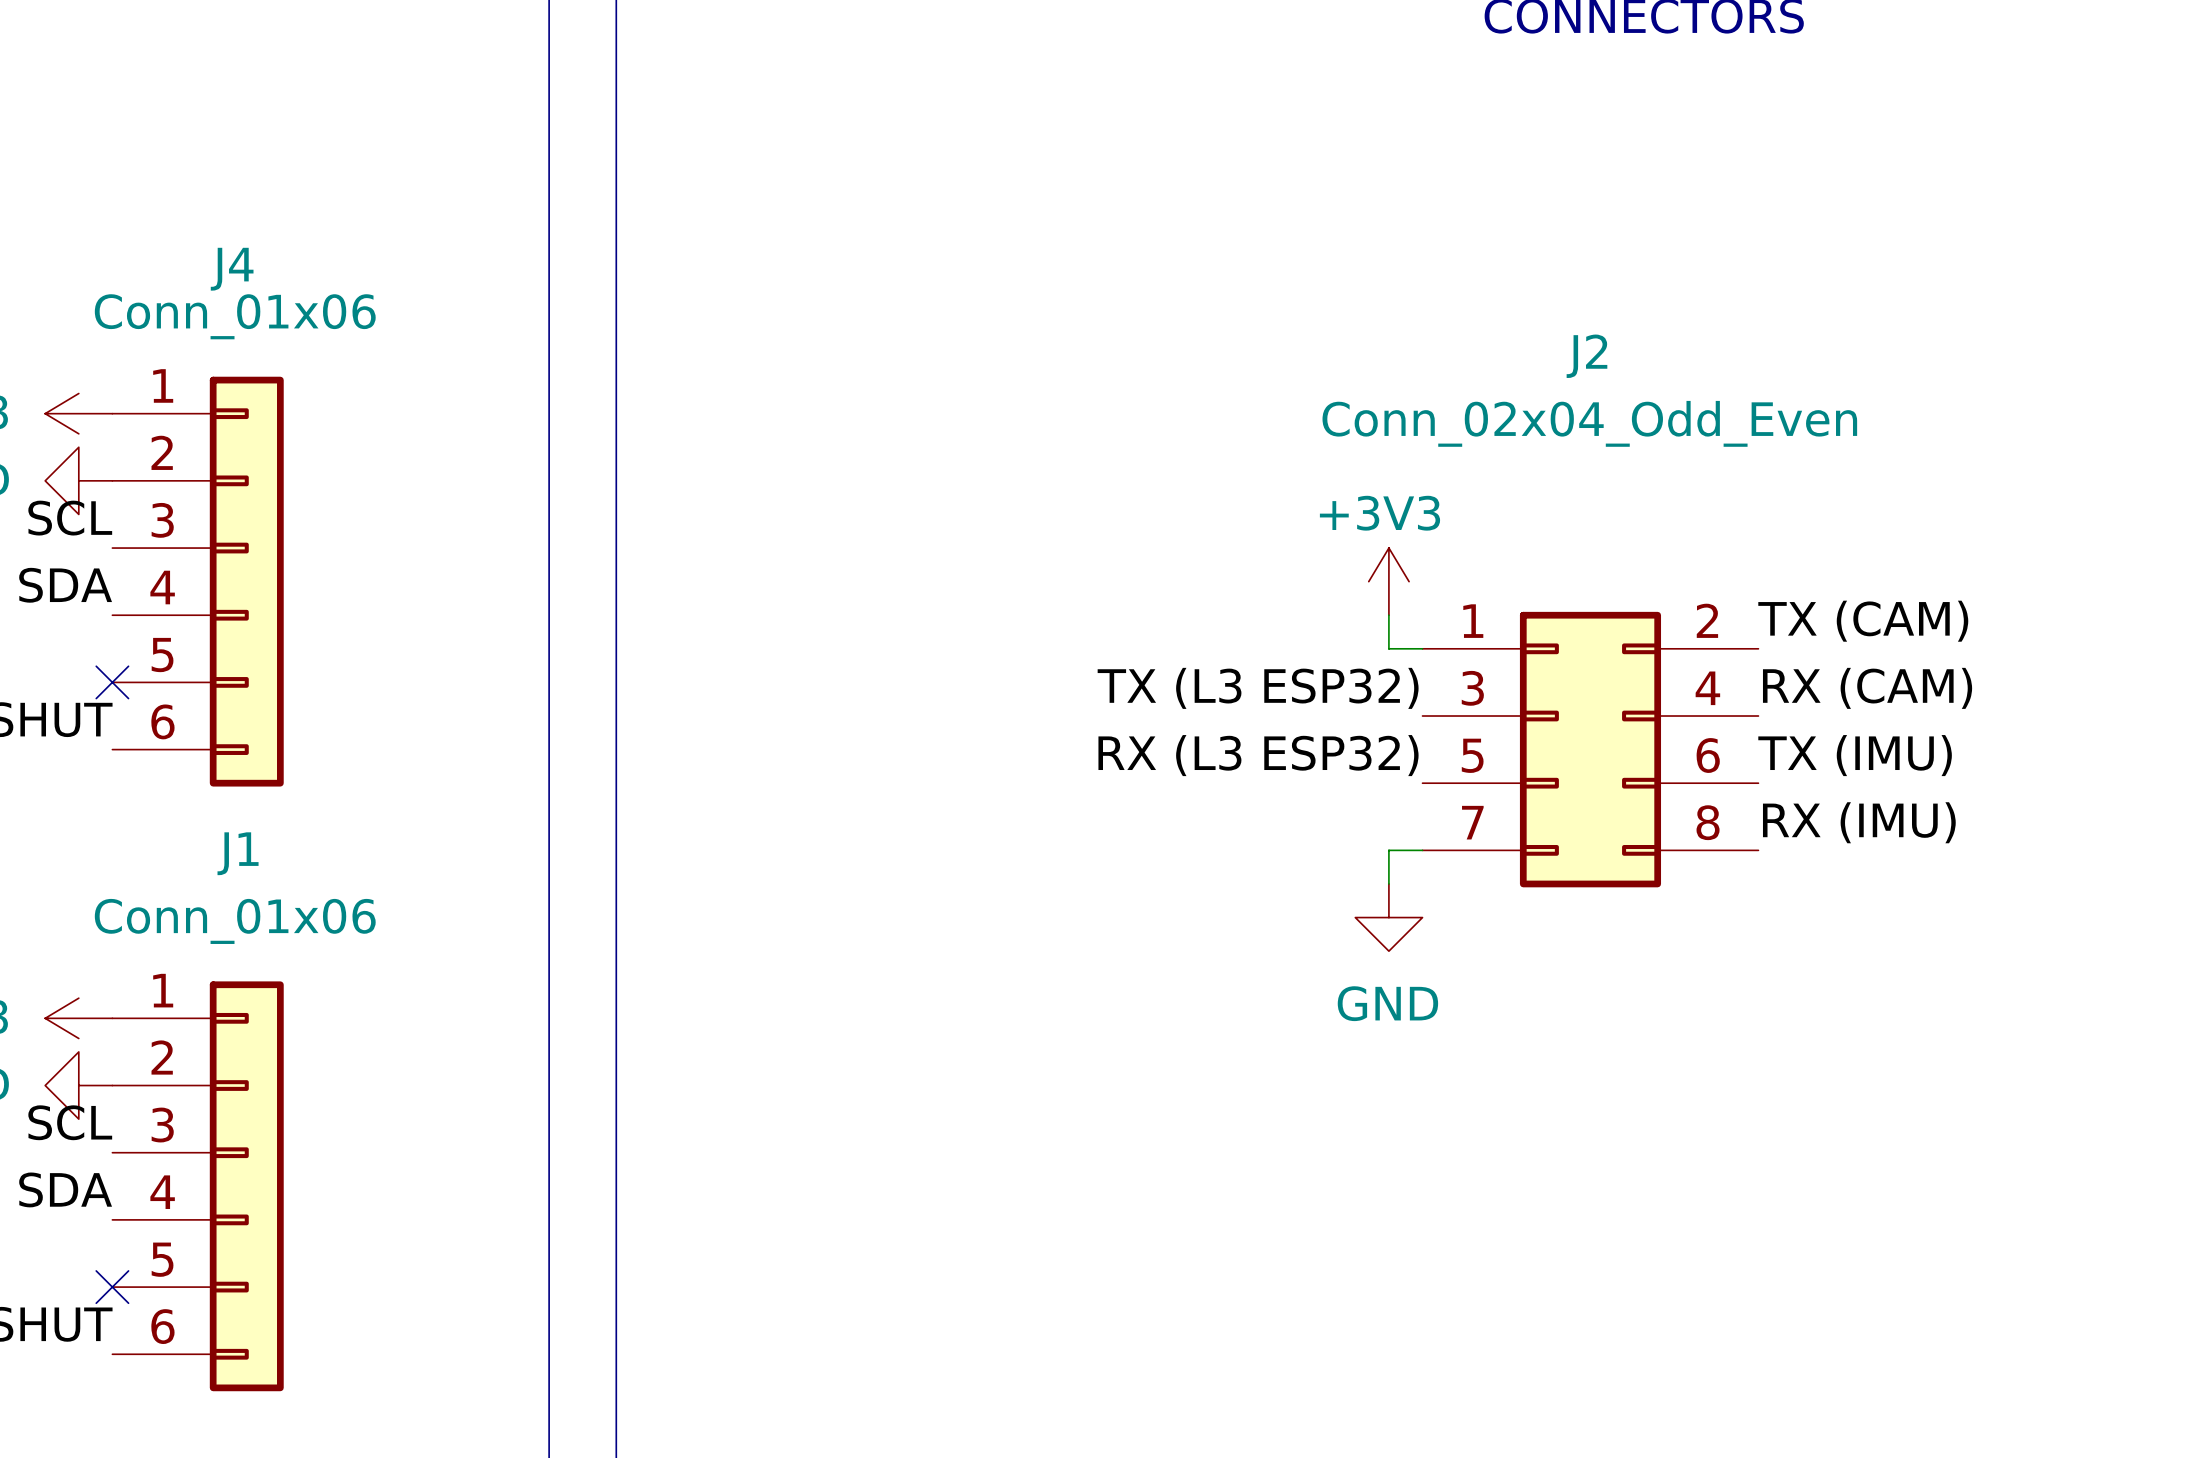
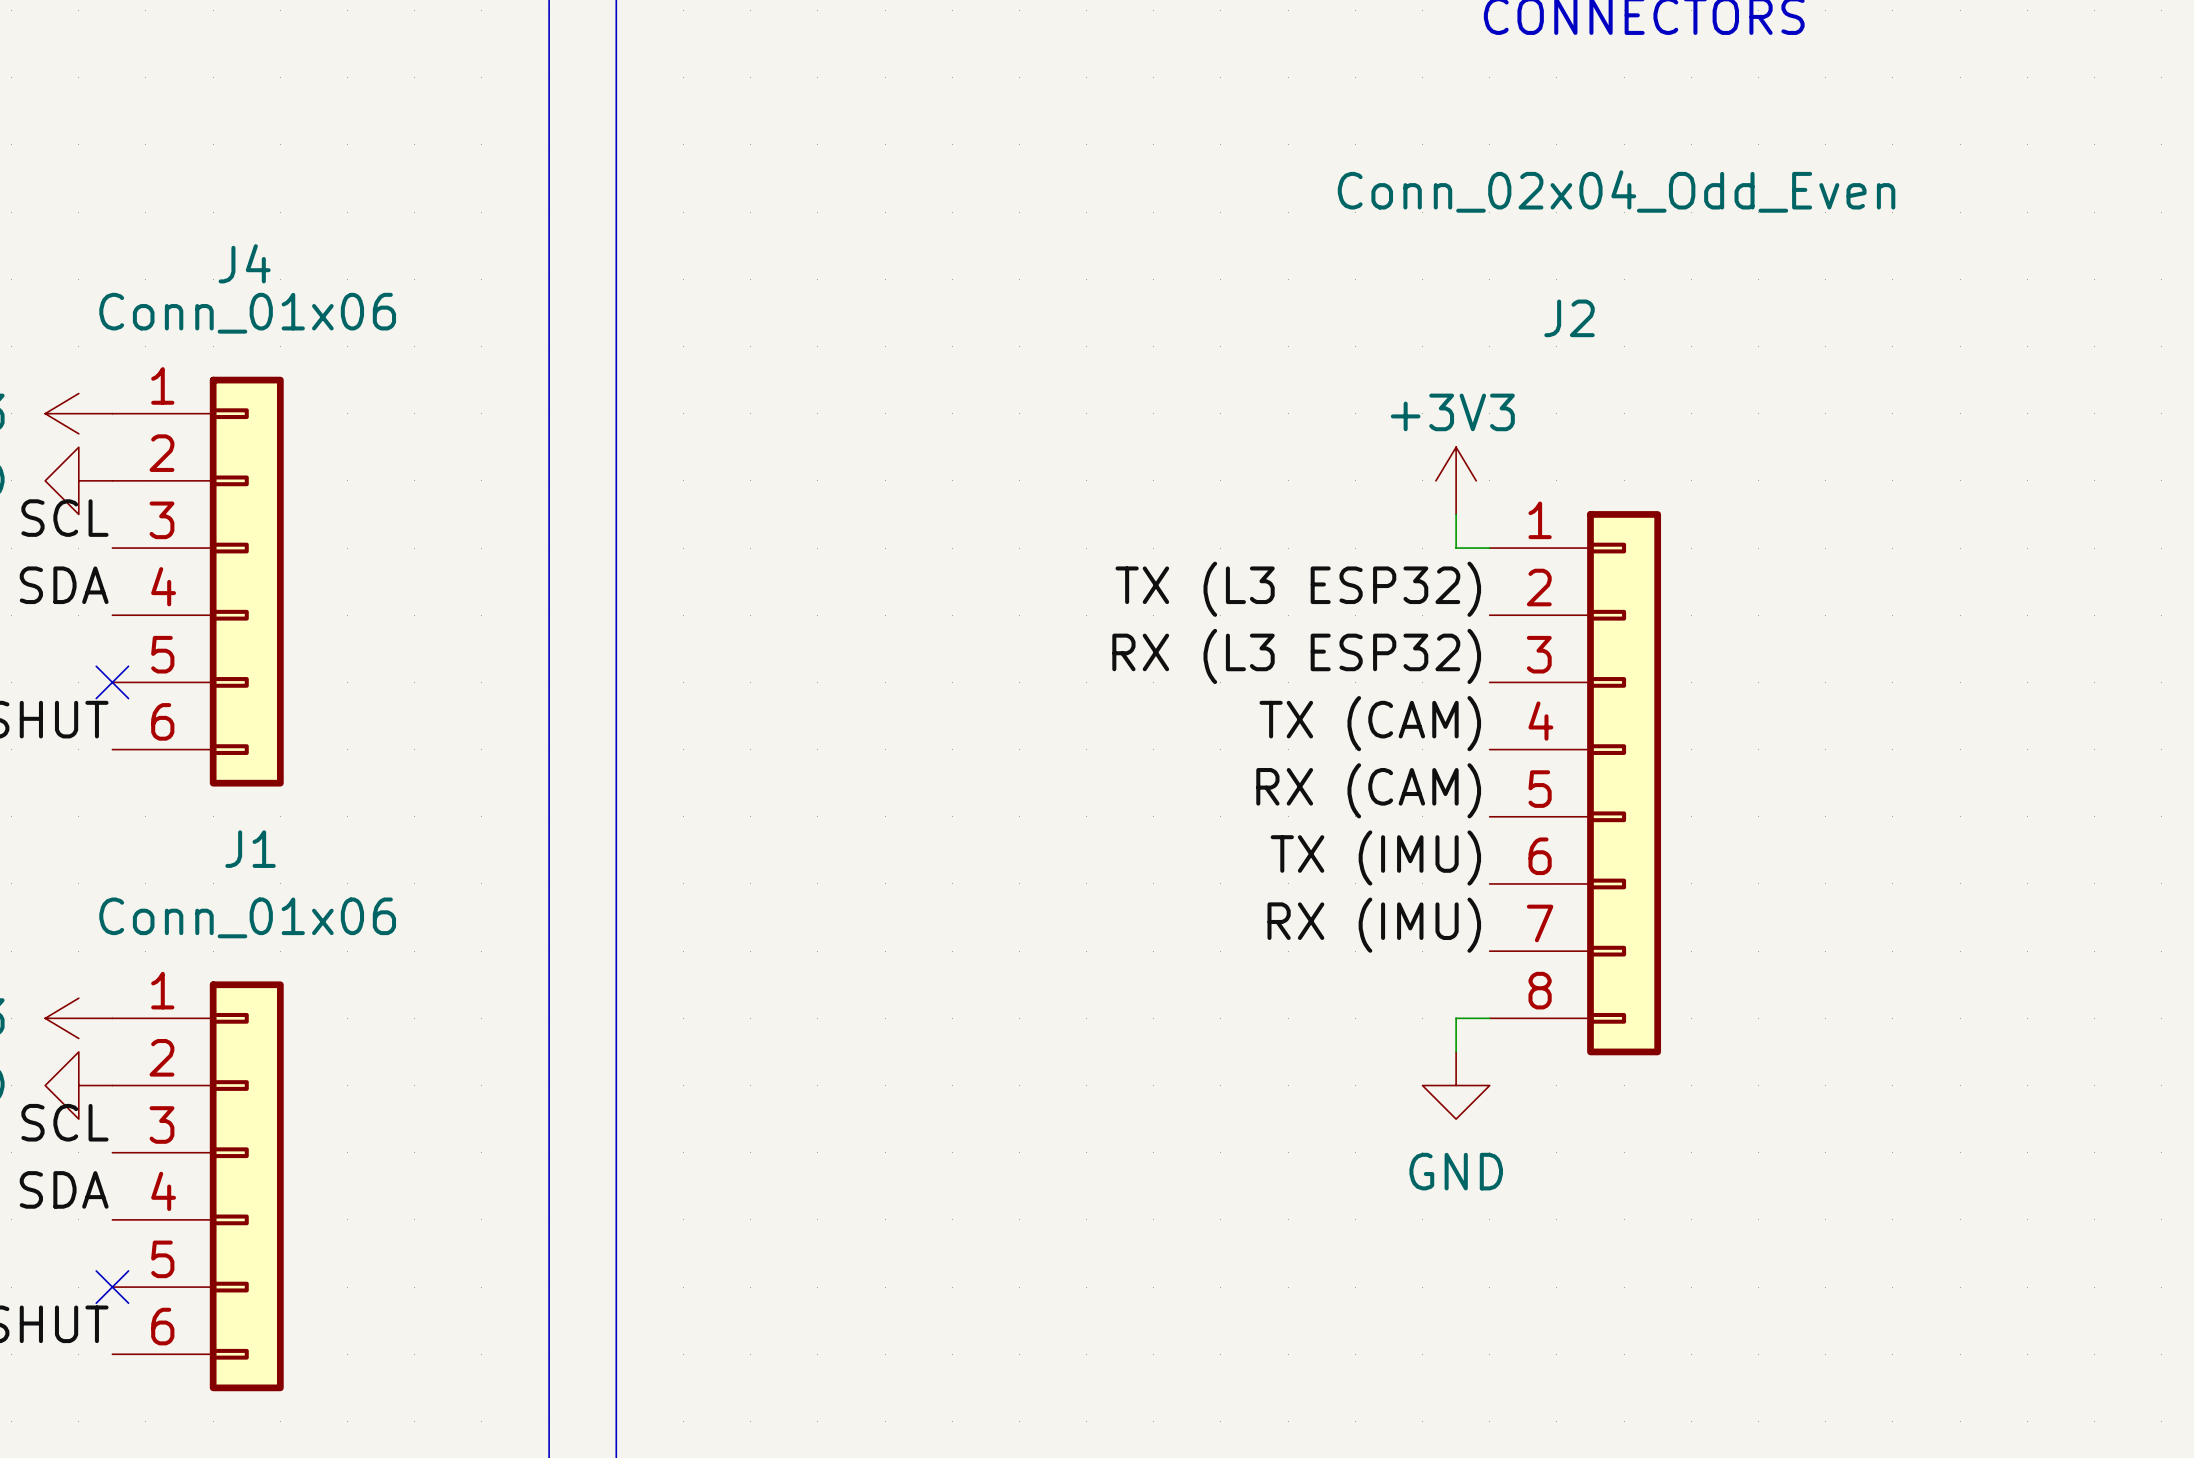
J2 name position: J2 (1586, 356) -> J2 (1569, 318)
J2 value position: Conn_02x04_Odd_Even (1589, 423) -> Conn_02x04_Odd_Even (1616, 191)
power symbol position: +3V3 (1388, 581) -> +3V3 (1456, 480)
J2 symbol: [1422, 611, 1759, 888] -> [1489, 511, 1662, 1056]
wire: (1388, 615) (1388, 648) (1422, 648) -> (1456, 514) (1456, 548) (1489, 548)
label position: TX (CAM) (1863, 621) -> TX (CAM) (1370, 723)
label position: TX (L3 ESP32) (1258, 688) -> TX (L3 ESP32) (1298, 589)
label position: RX (CAM) (1867, 688) -> RX (CAM) (1368, 790)
label position: RX (L3 ESP32) (1258, 755) -> RX (L3 ESP32) (1296, 656)
label position: TX (IMU) (1855, 755) -> TX (IMU) (1375, 857)
label position: RX (IMU) (1859, 822) -> RX (IMU) (1374, 925)
wire: (1422, 850) (1388, 850) (1388, 883) -> (1489, 1018) (1456, 1018) (1456, 1051)
power symbol position: GND (1388, 917) -> GND (1456, 1085)

